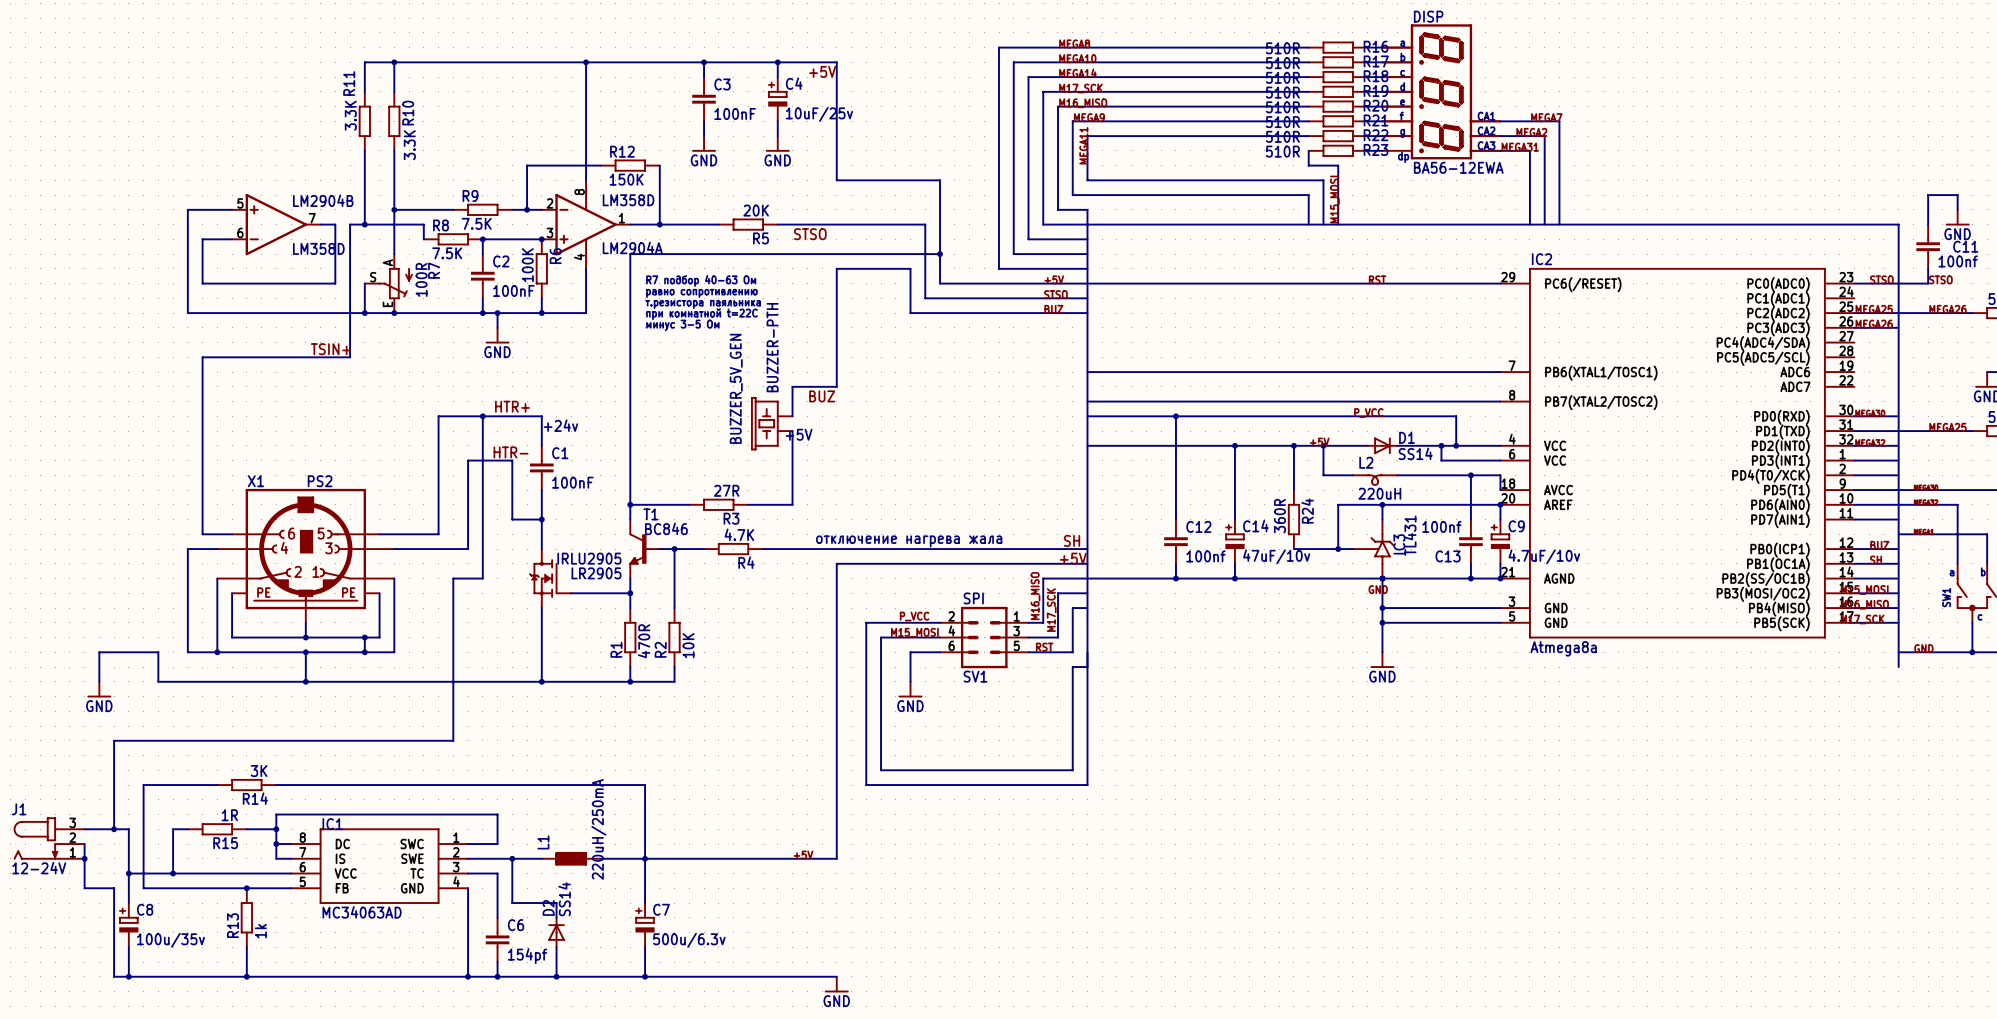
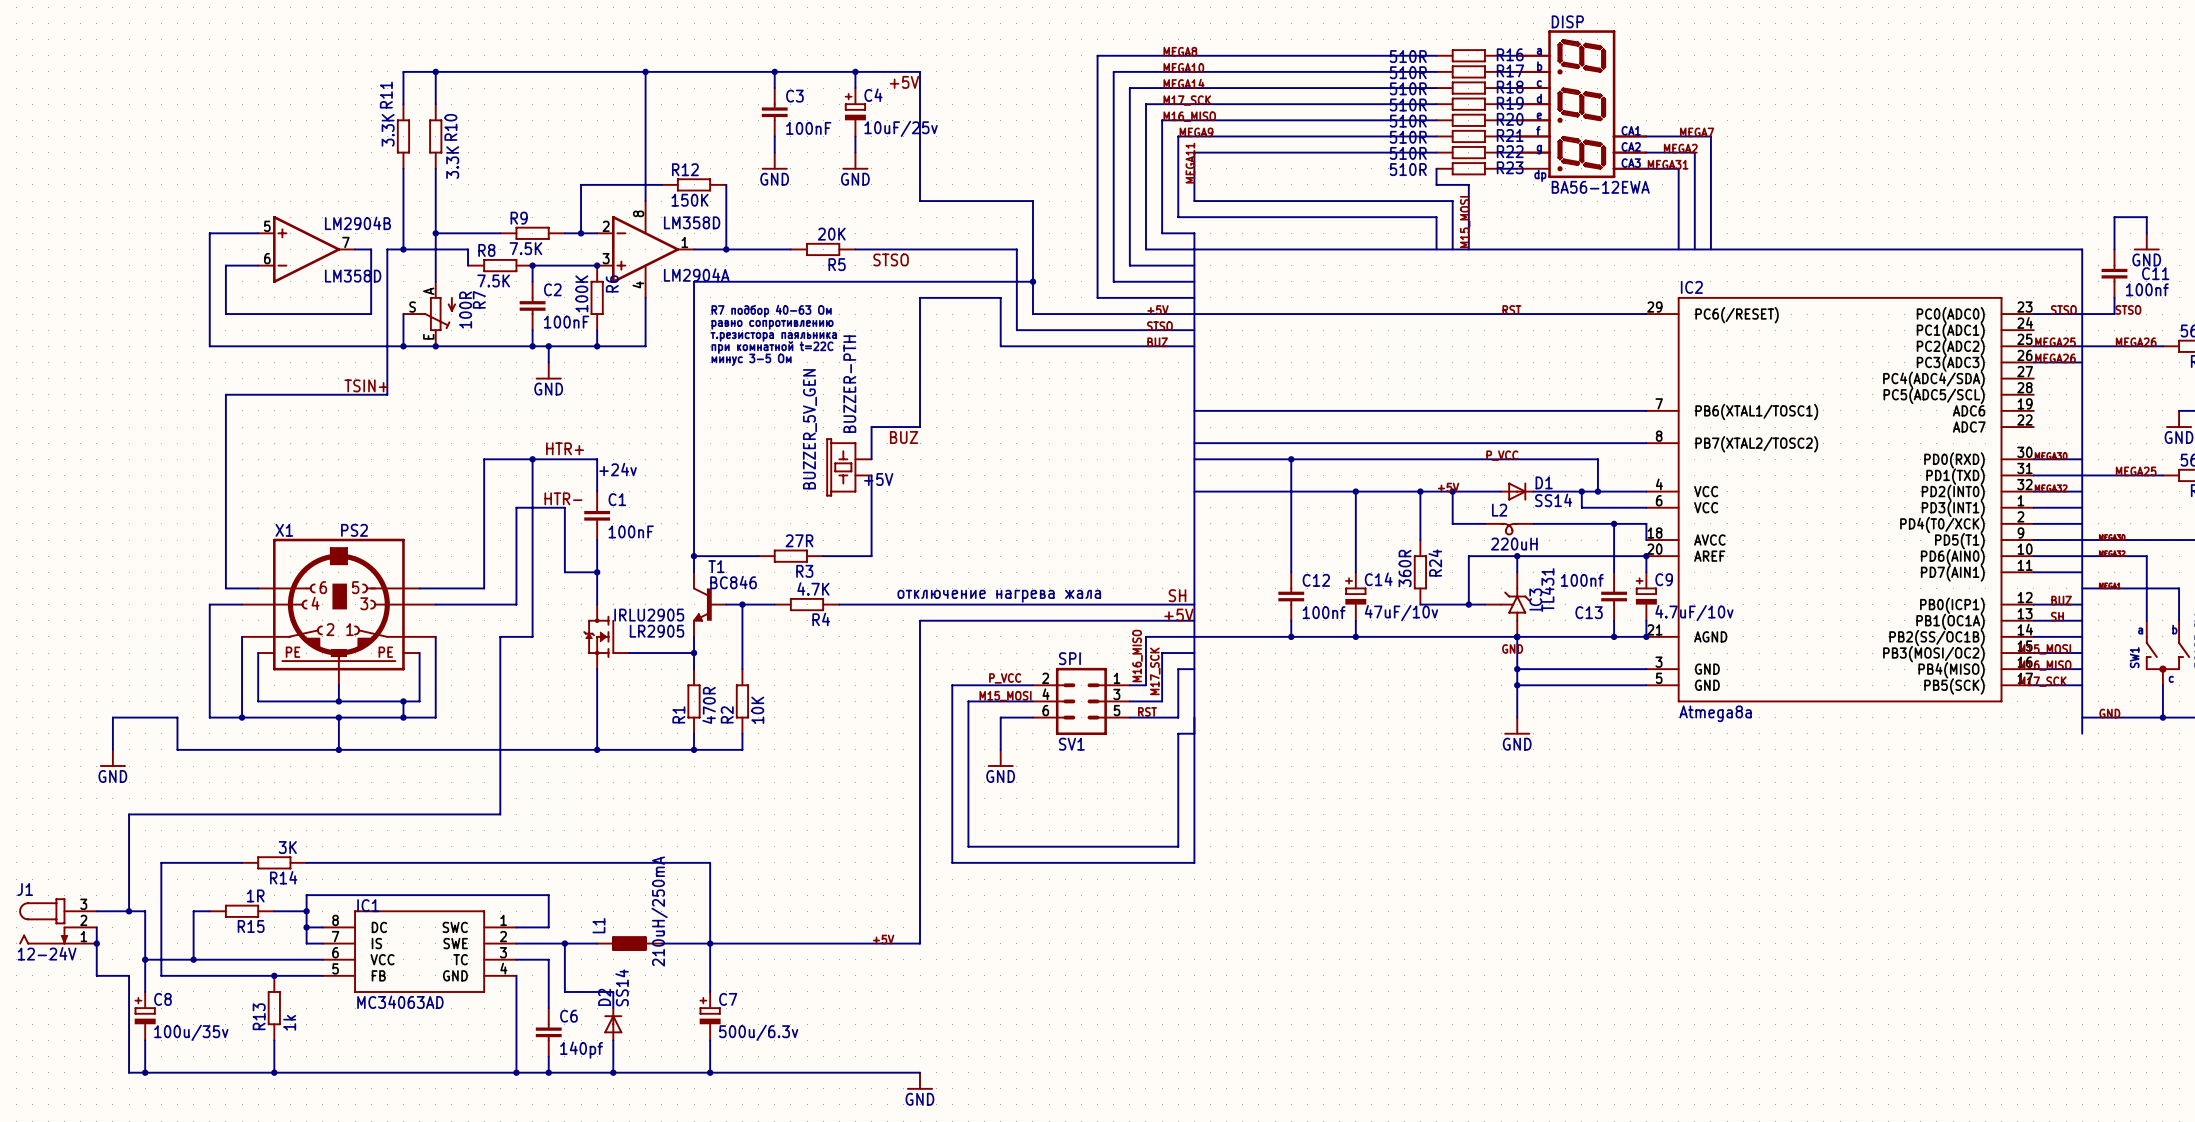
L1 value: 220uH/250mA (598, 829) -> 210uH/250mA (659, 911)
C6 value: 154pf (527, 956) -> 140pf (581, 1050)

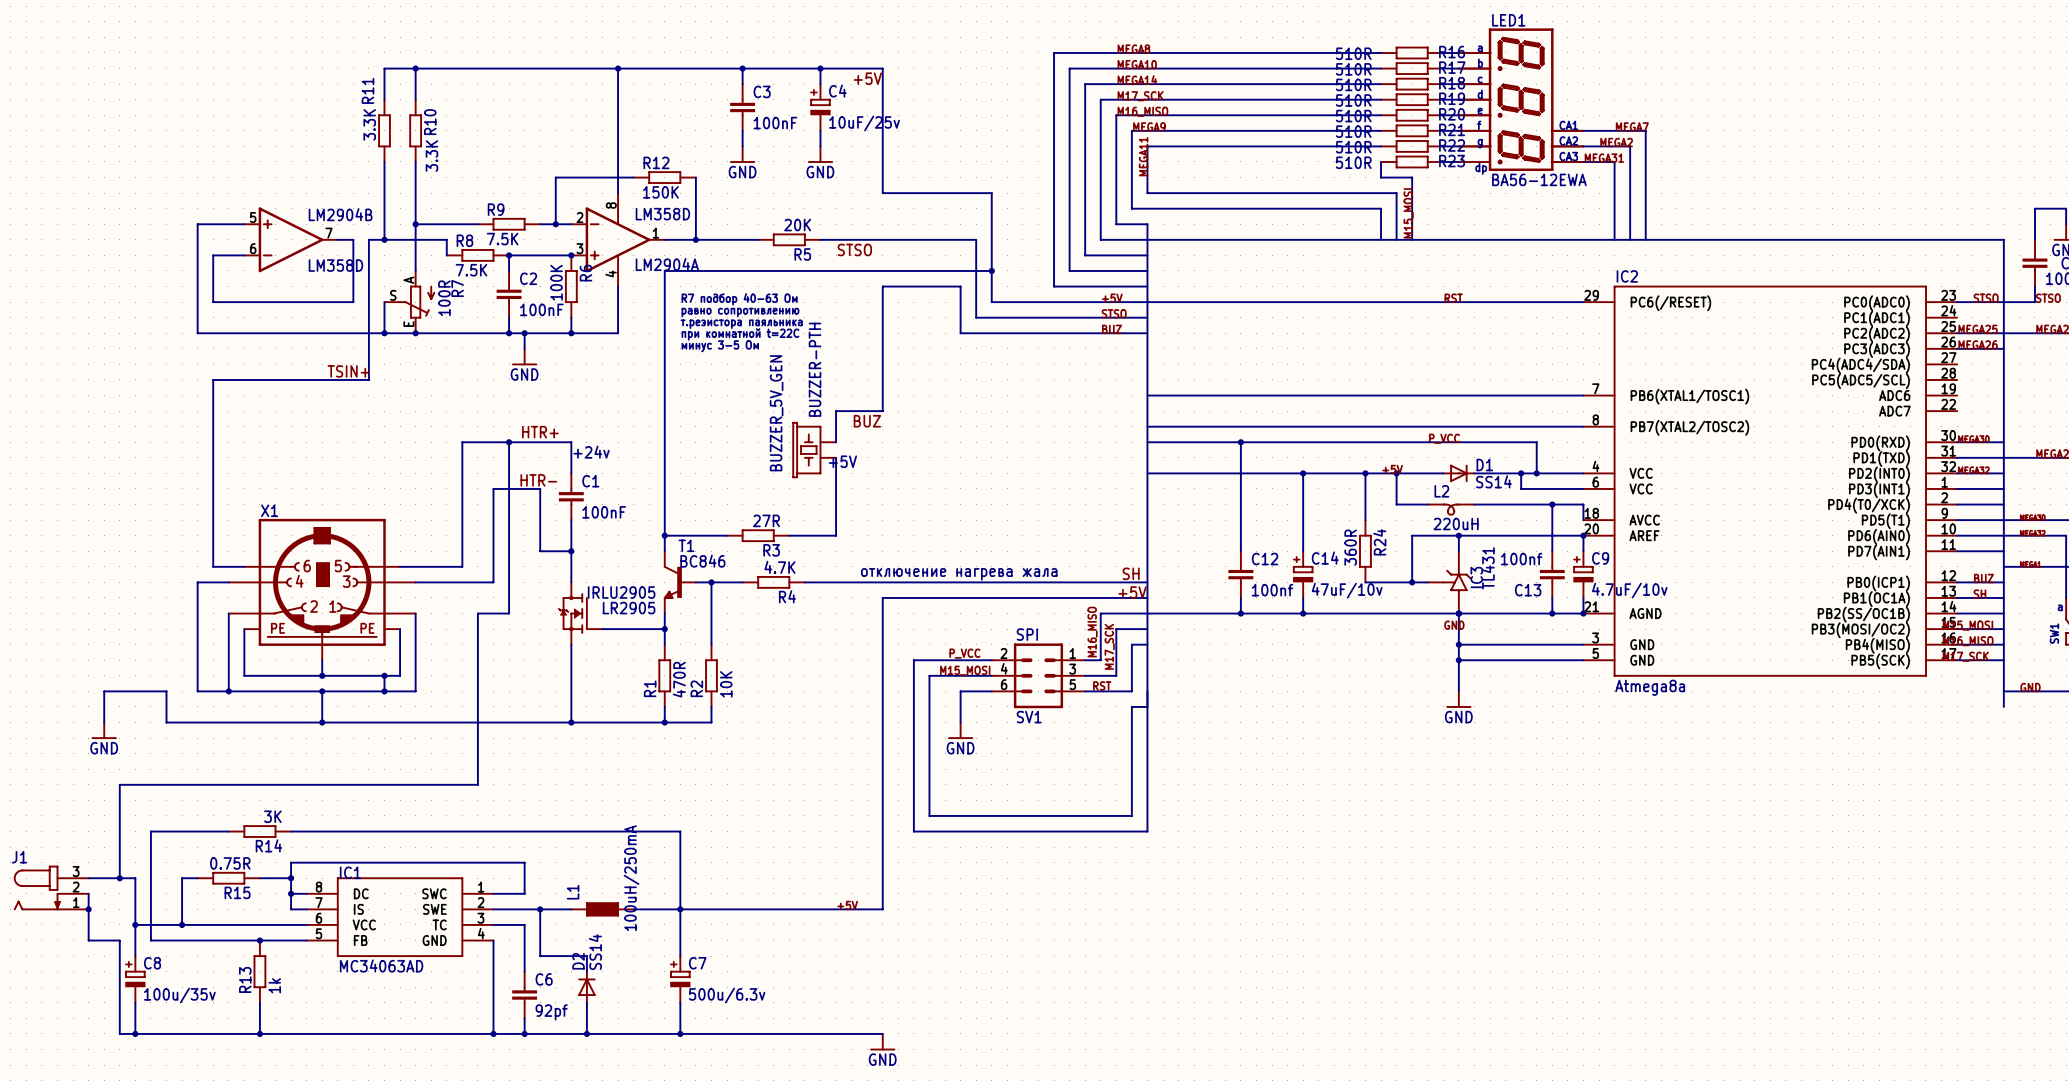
DISP name: DISP (1567, 21) -> LED1 (1508, 20)
X1 value: PS2 (354, 530) -> none
R15 value: 1R (255, 895) -> 0.75R (230, 863)
L1 value: 210uH/250mA (659, 911) -> 100uH/250mA (631, 878)
J1 value: 12-24V (47, 953) -> none
C6 value: 140pf (581, 1050) -> 92pf (551, 1012)

